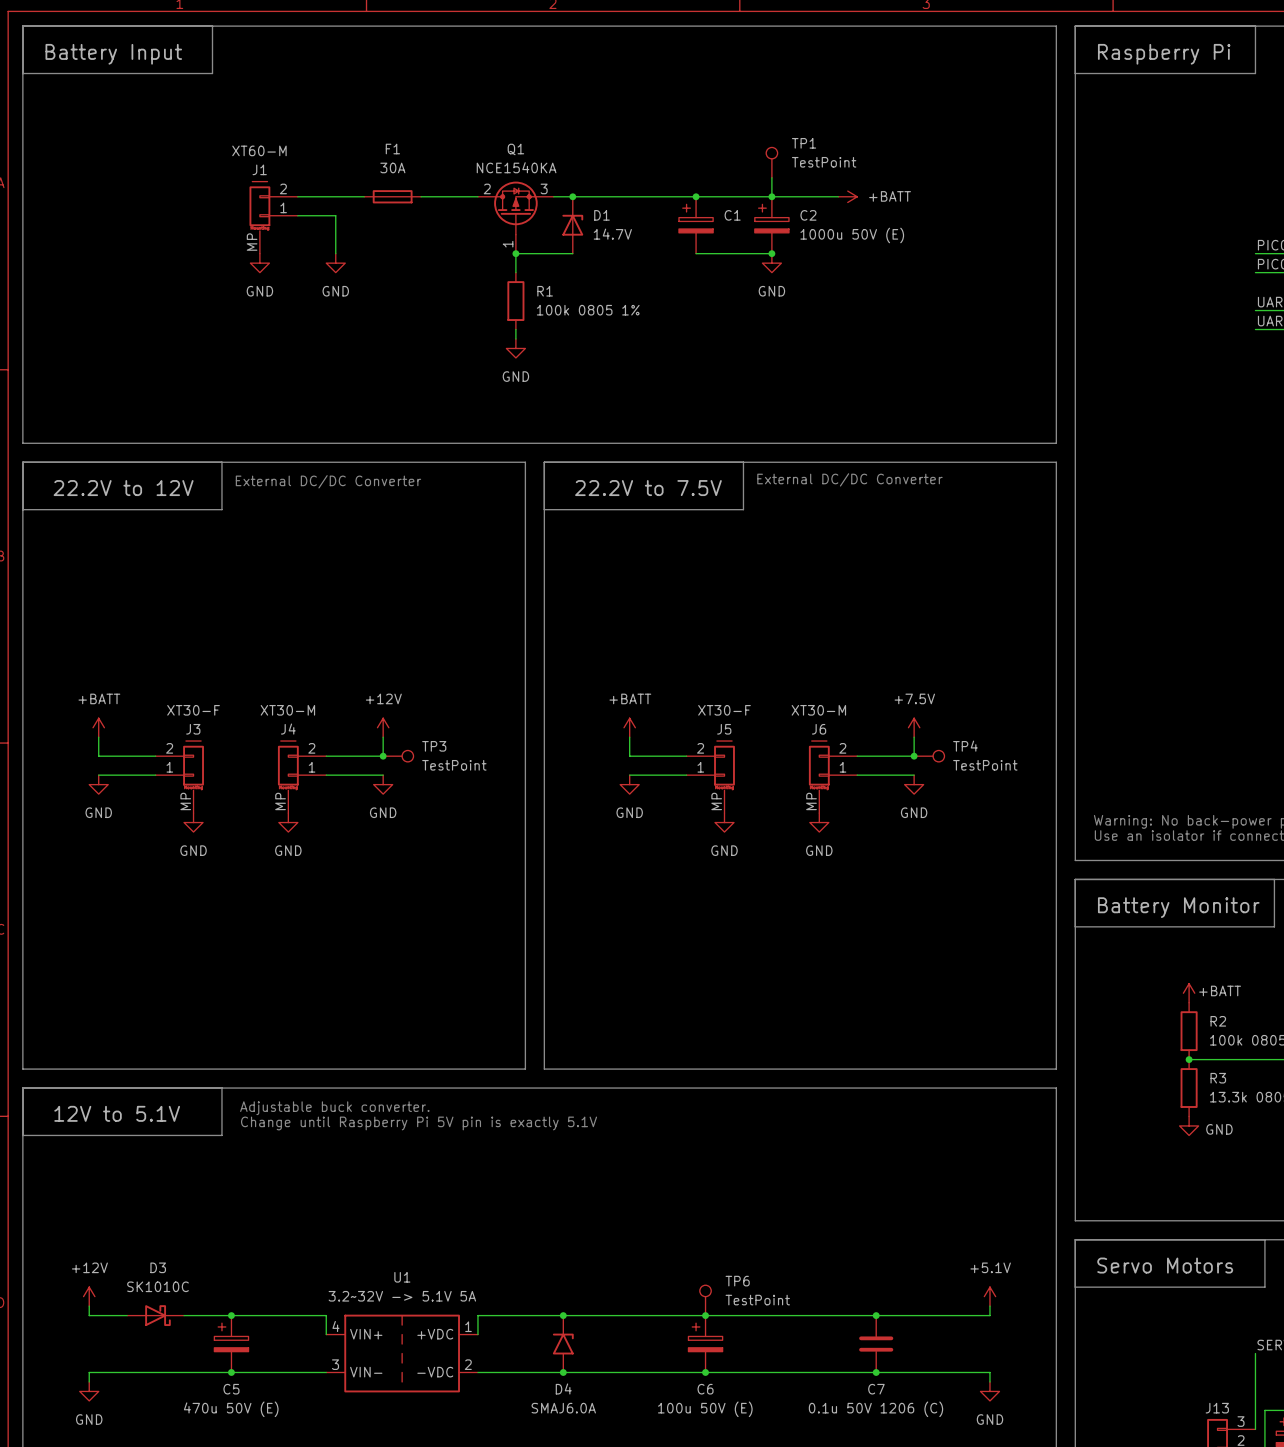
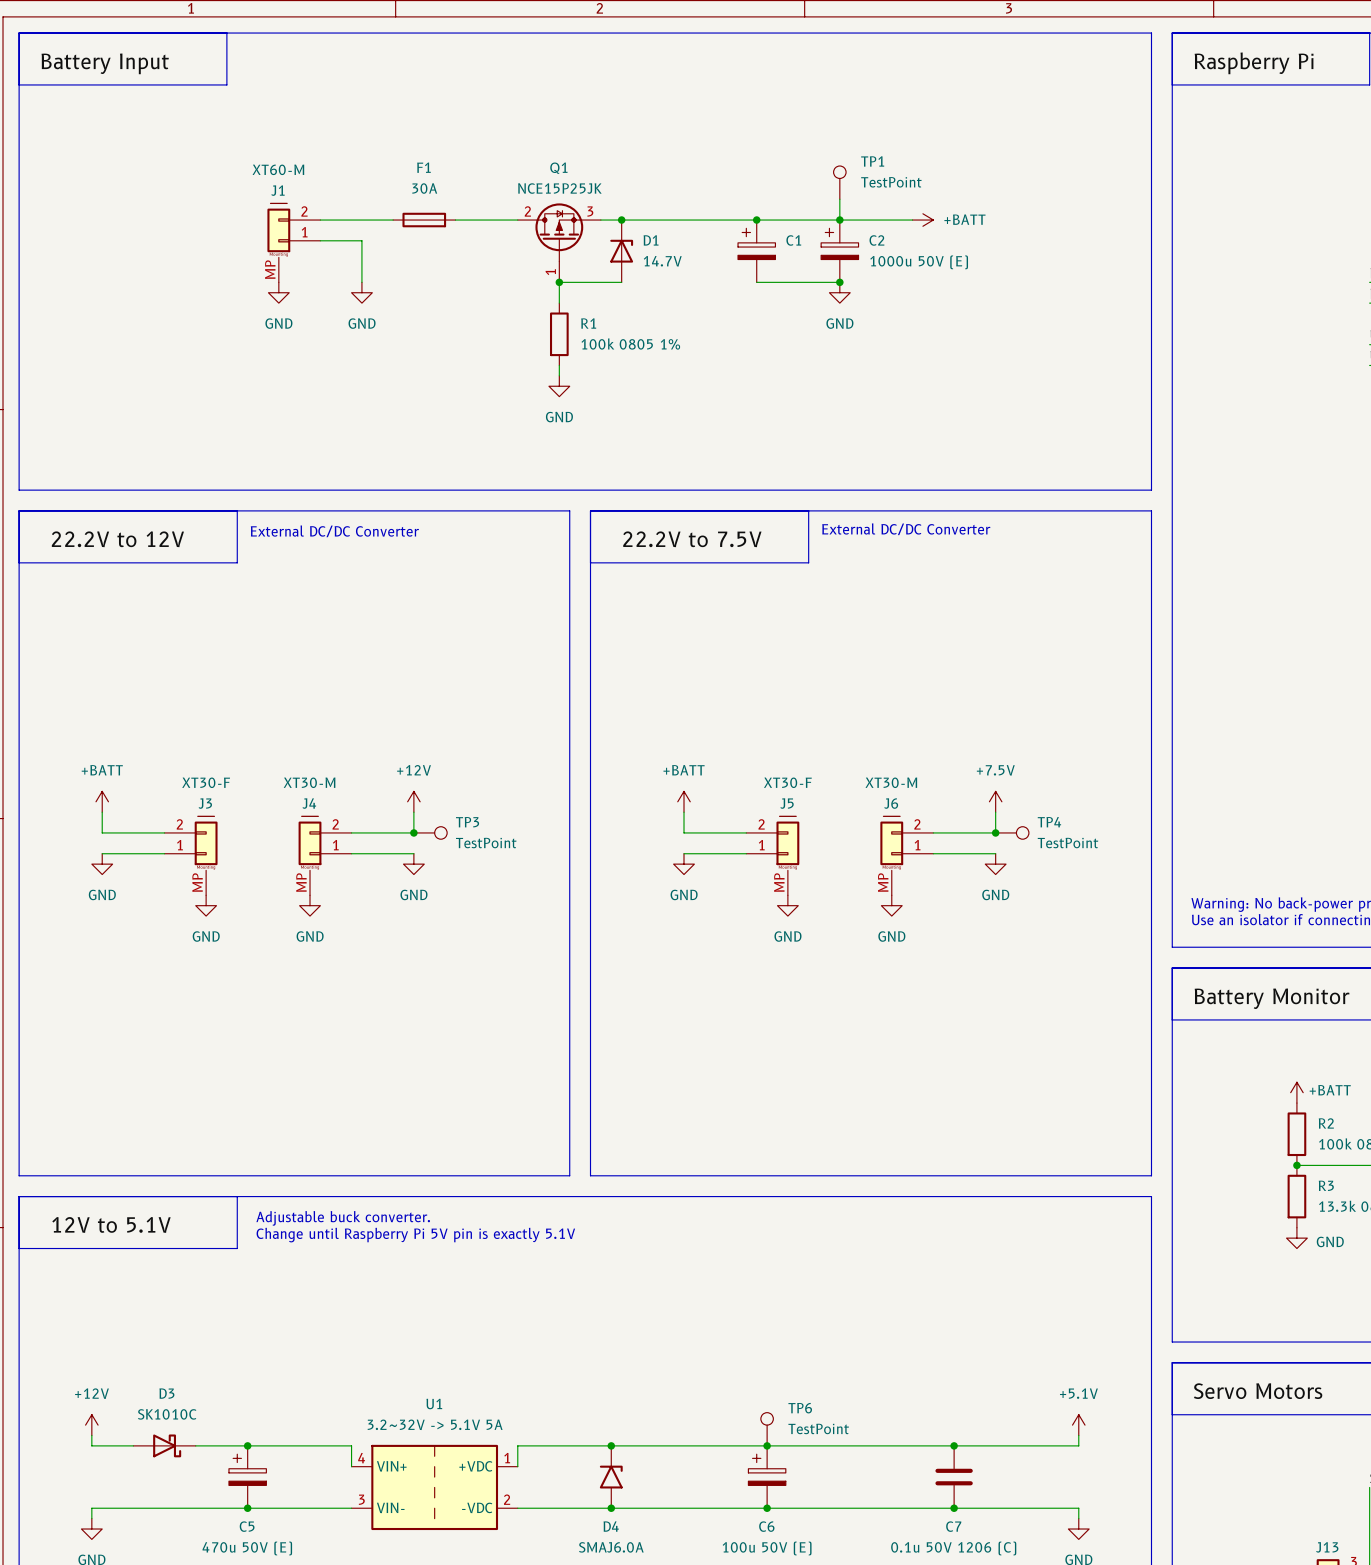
Q1 value: NCE1540KA (516, 167) -> NCE15P25JK (559, 188)

